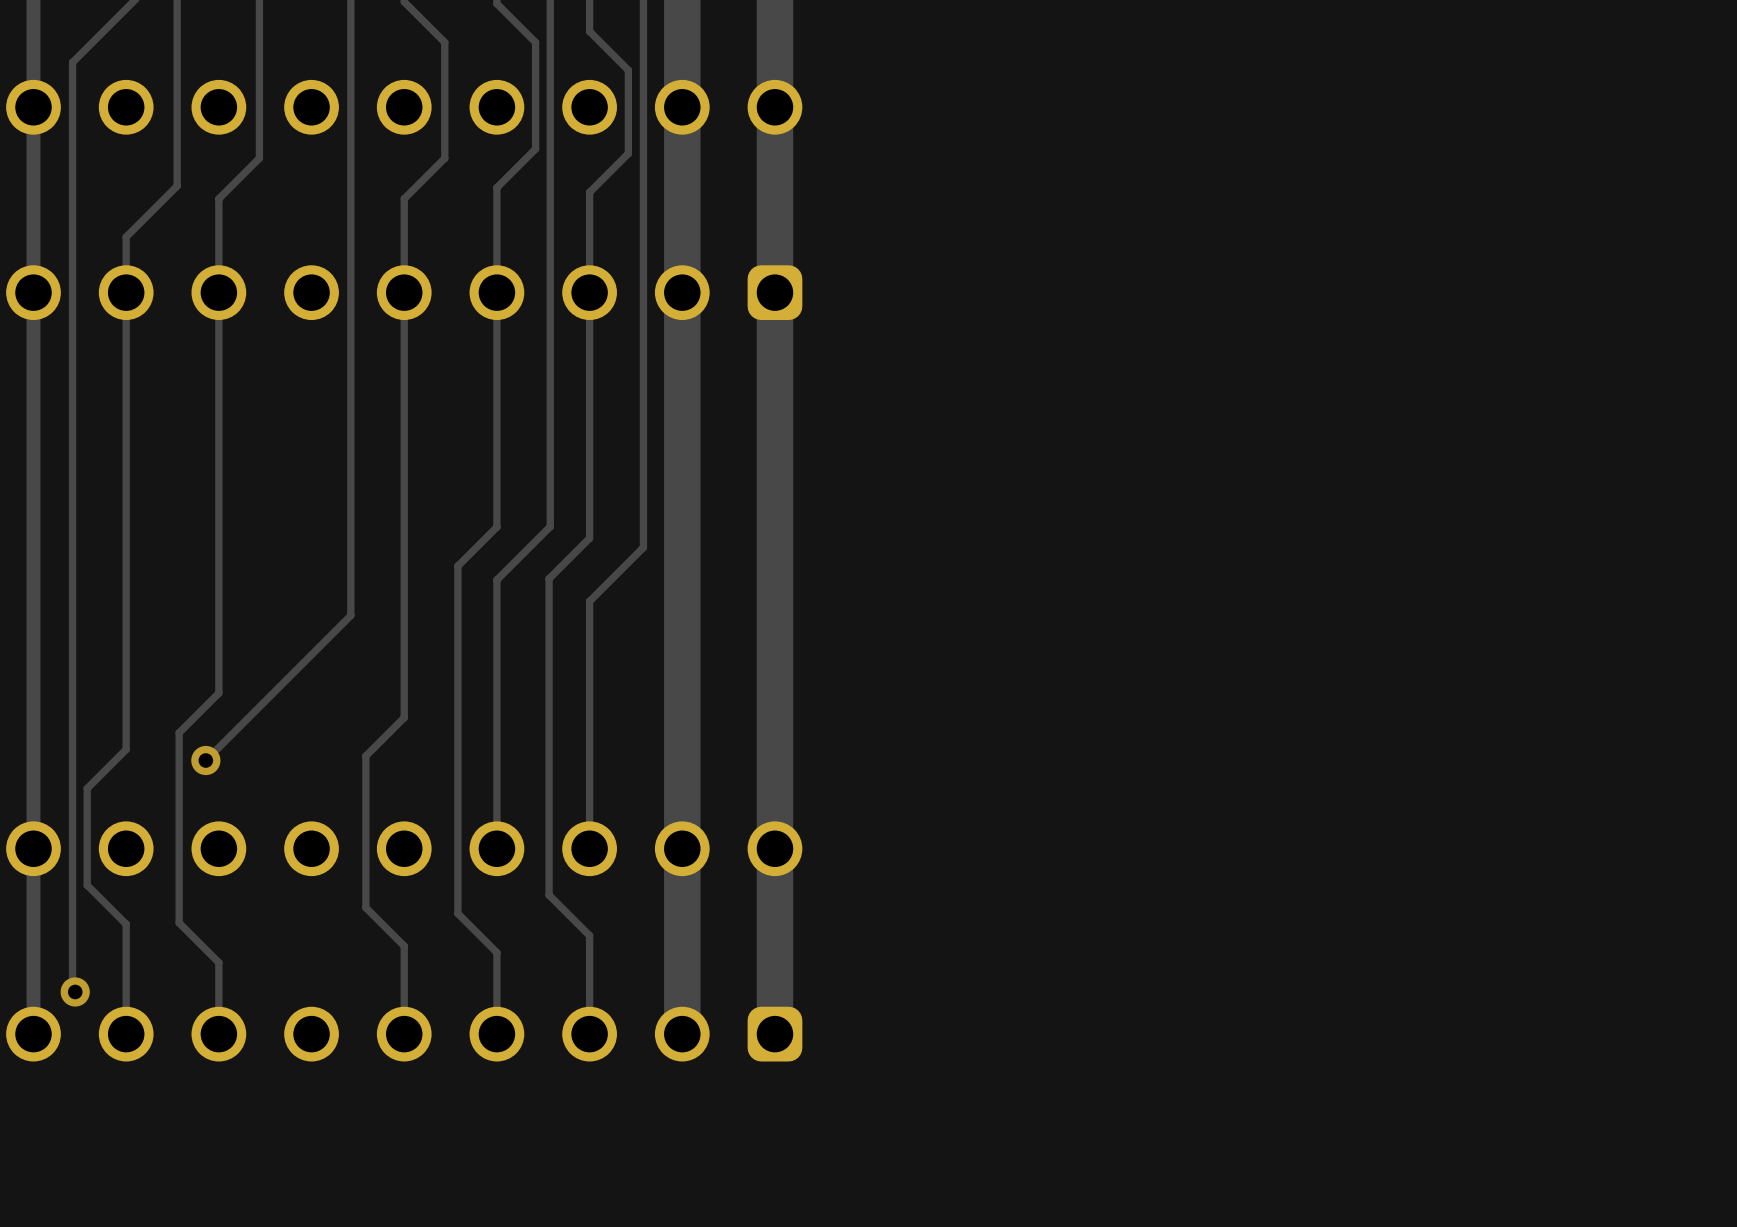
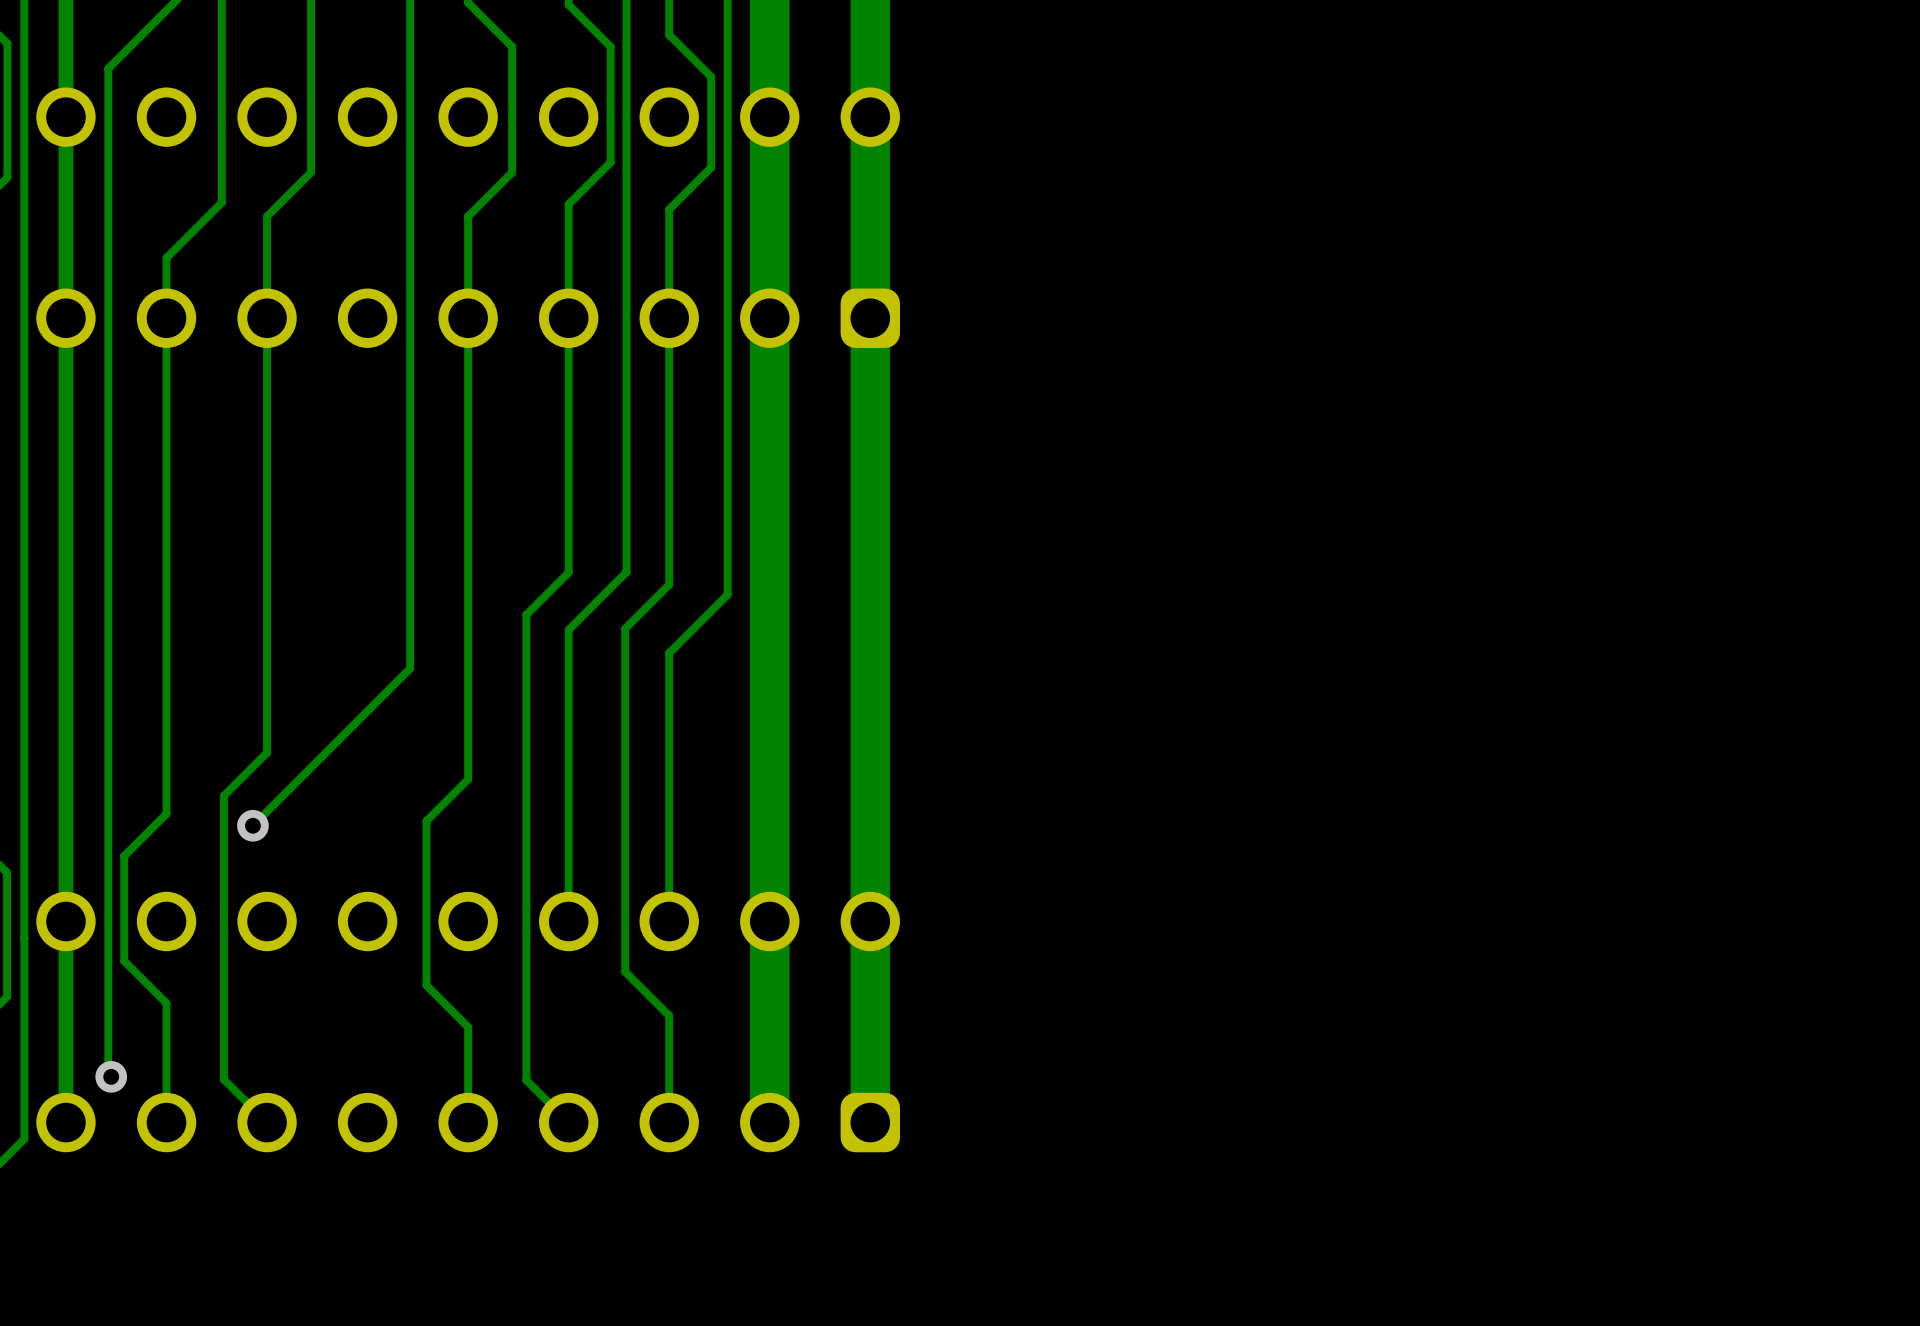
track: (457, 913) (496, 952) (496, 1034) -> (526, 991) (526, 1080) (568, 1122)
track: (179, 922) (218, 962) (218, 1034) -> (223, 1001) (223, 1079) (267, 1122)

